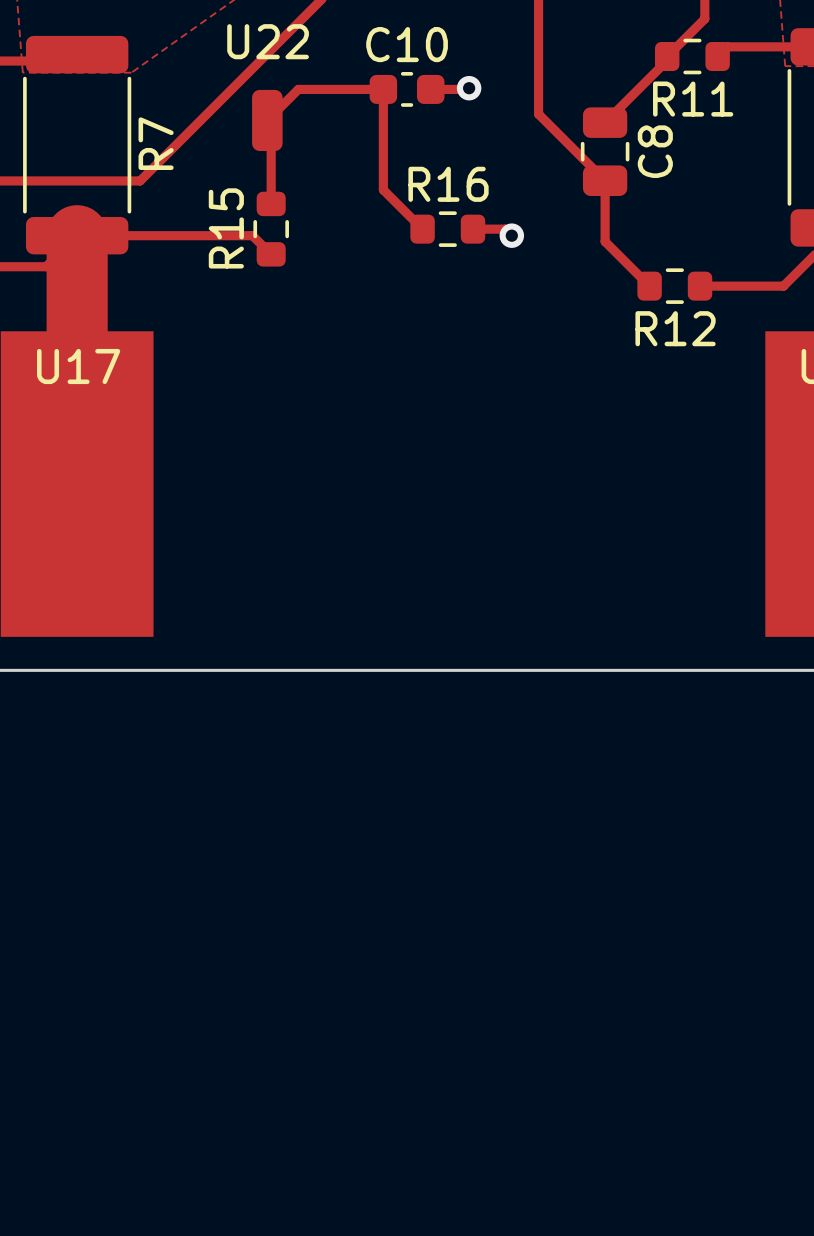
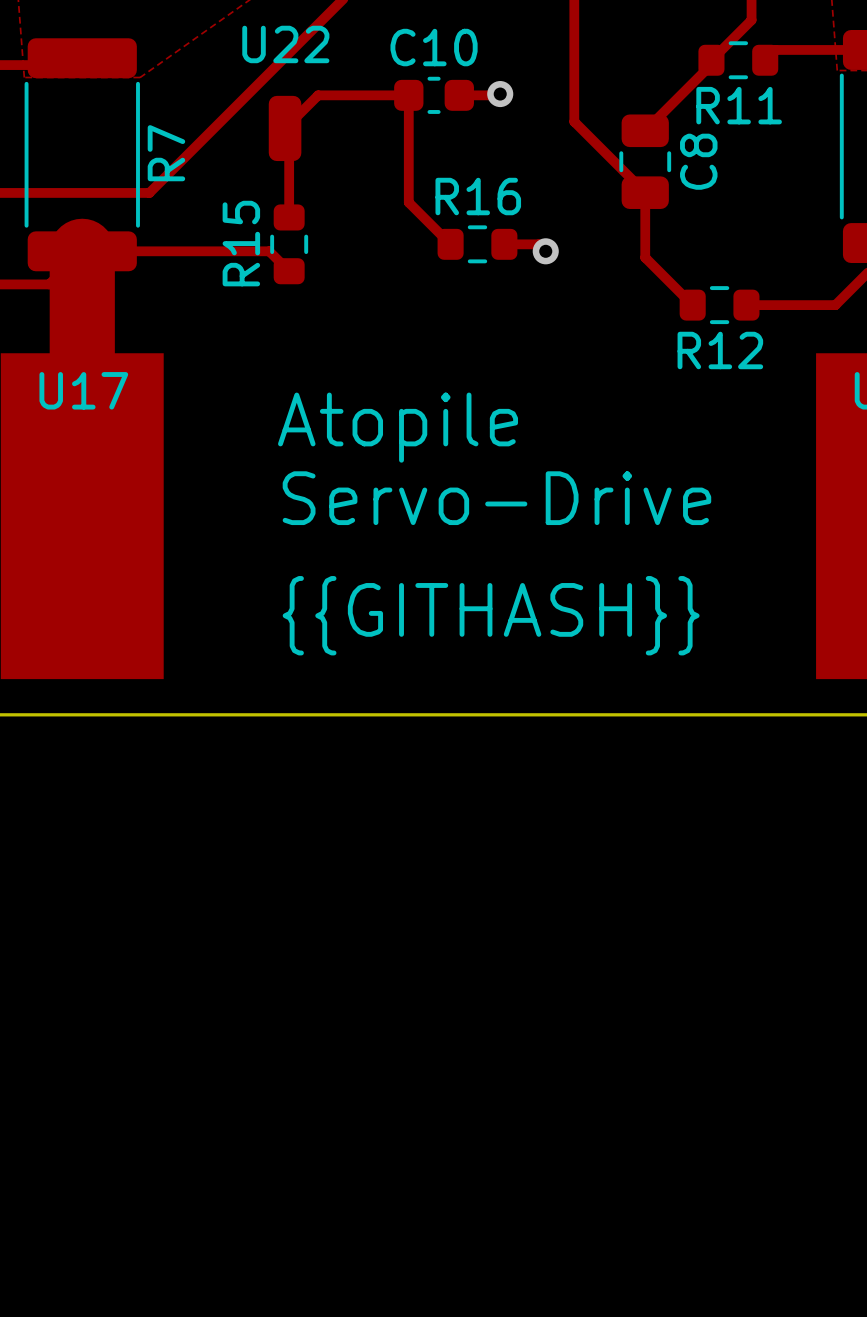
text: none -> Atopile (398, 427)
text: none -> Servo-Drive (496, 498)
text: none -> {{GITHASH}} (491, 615)

